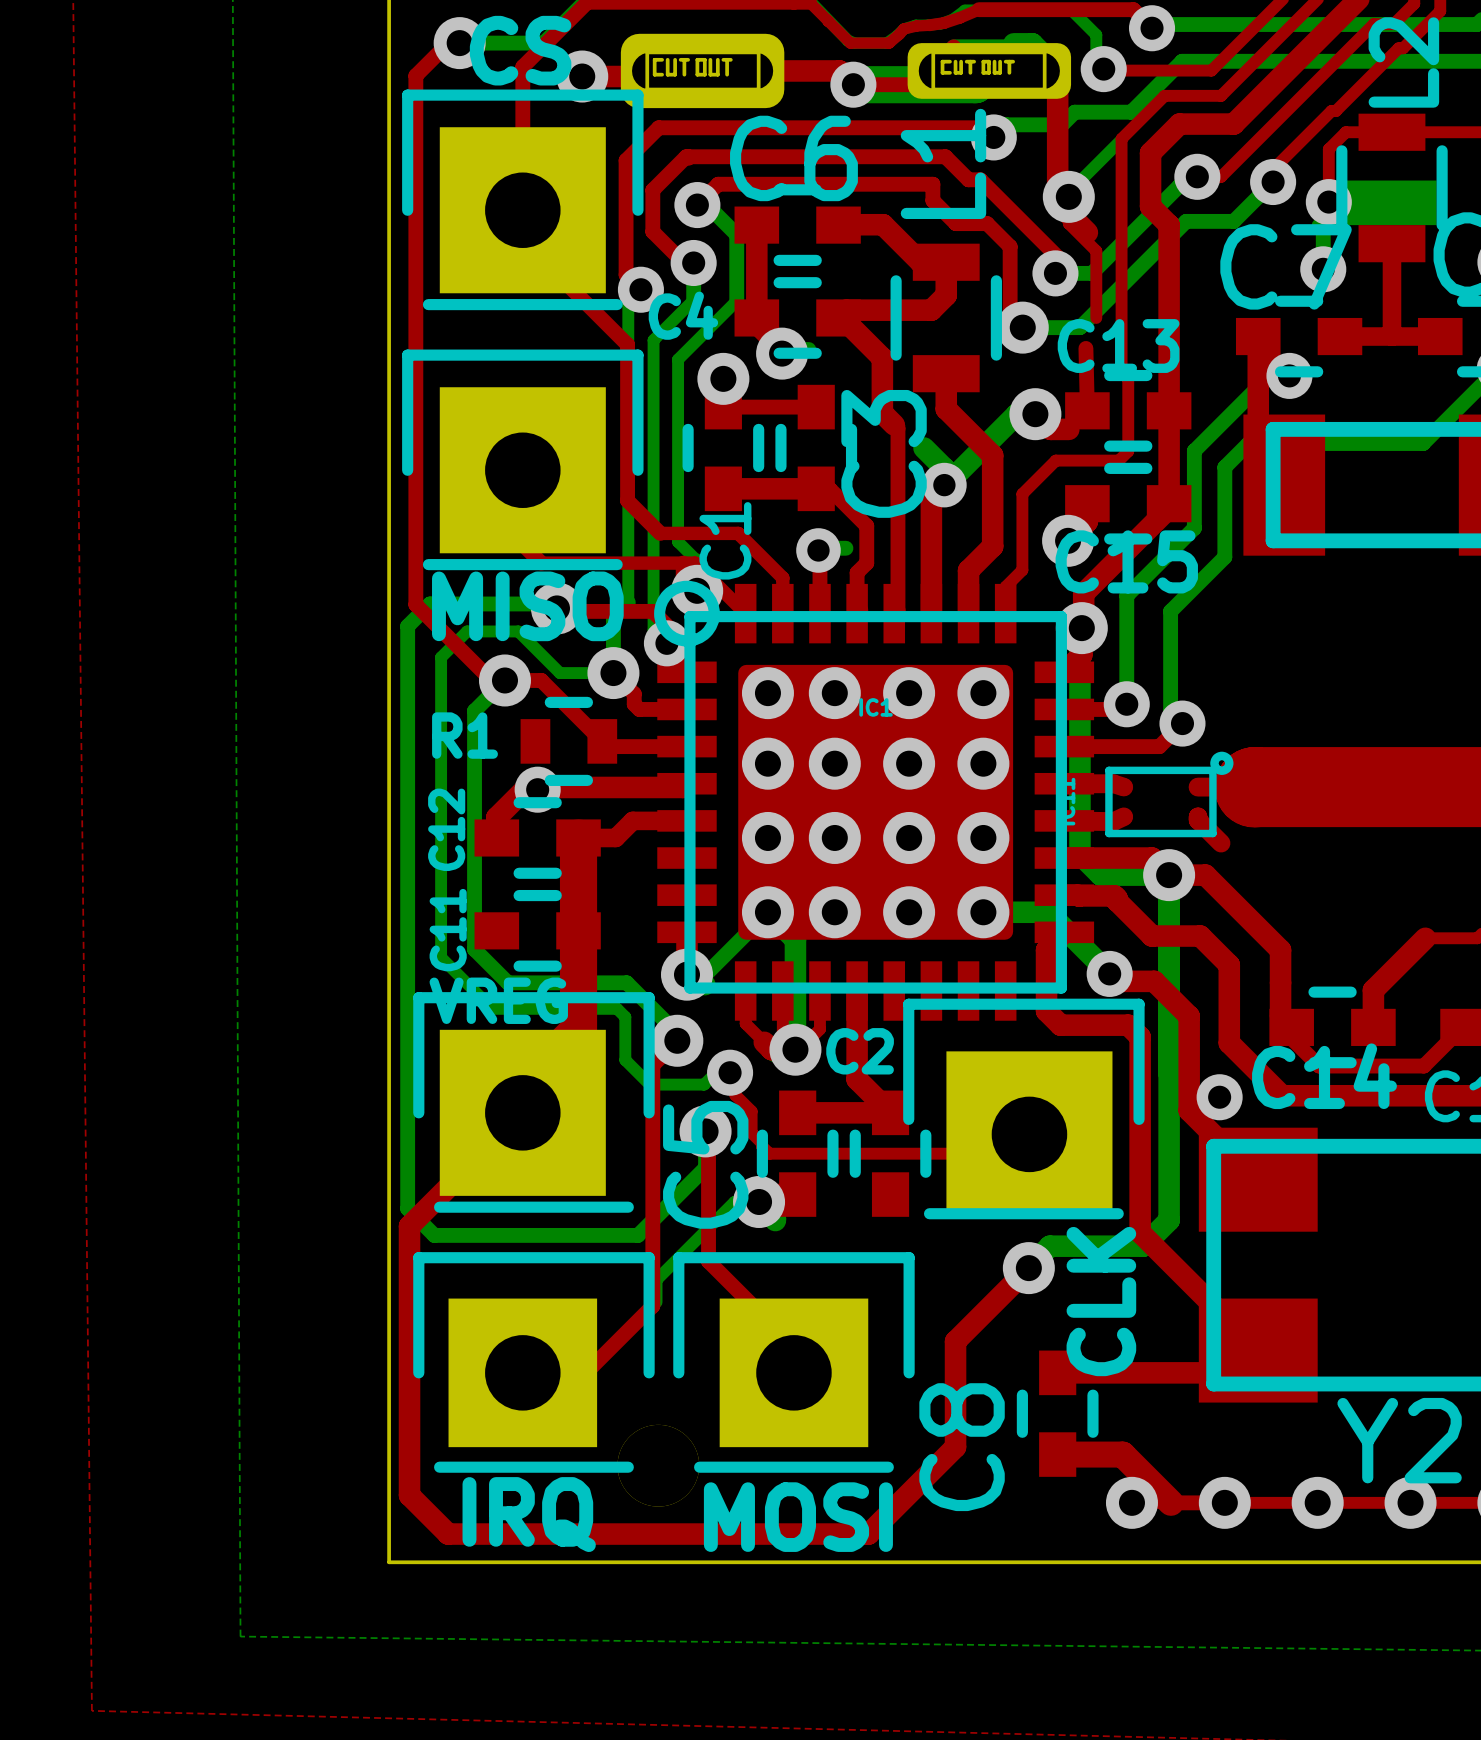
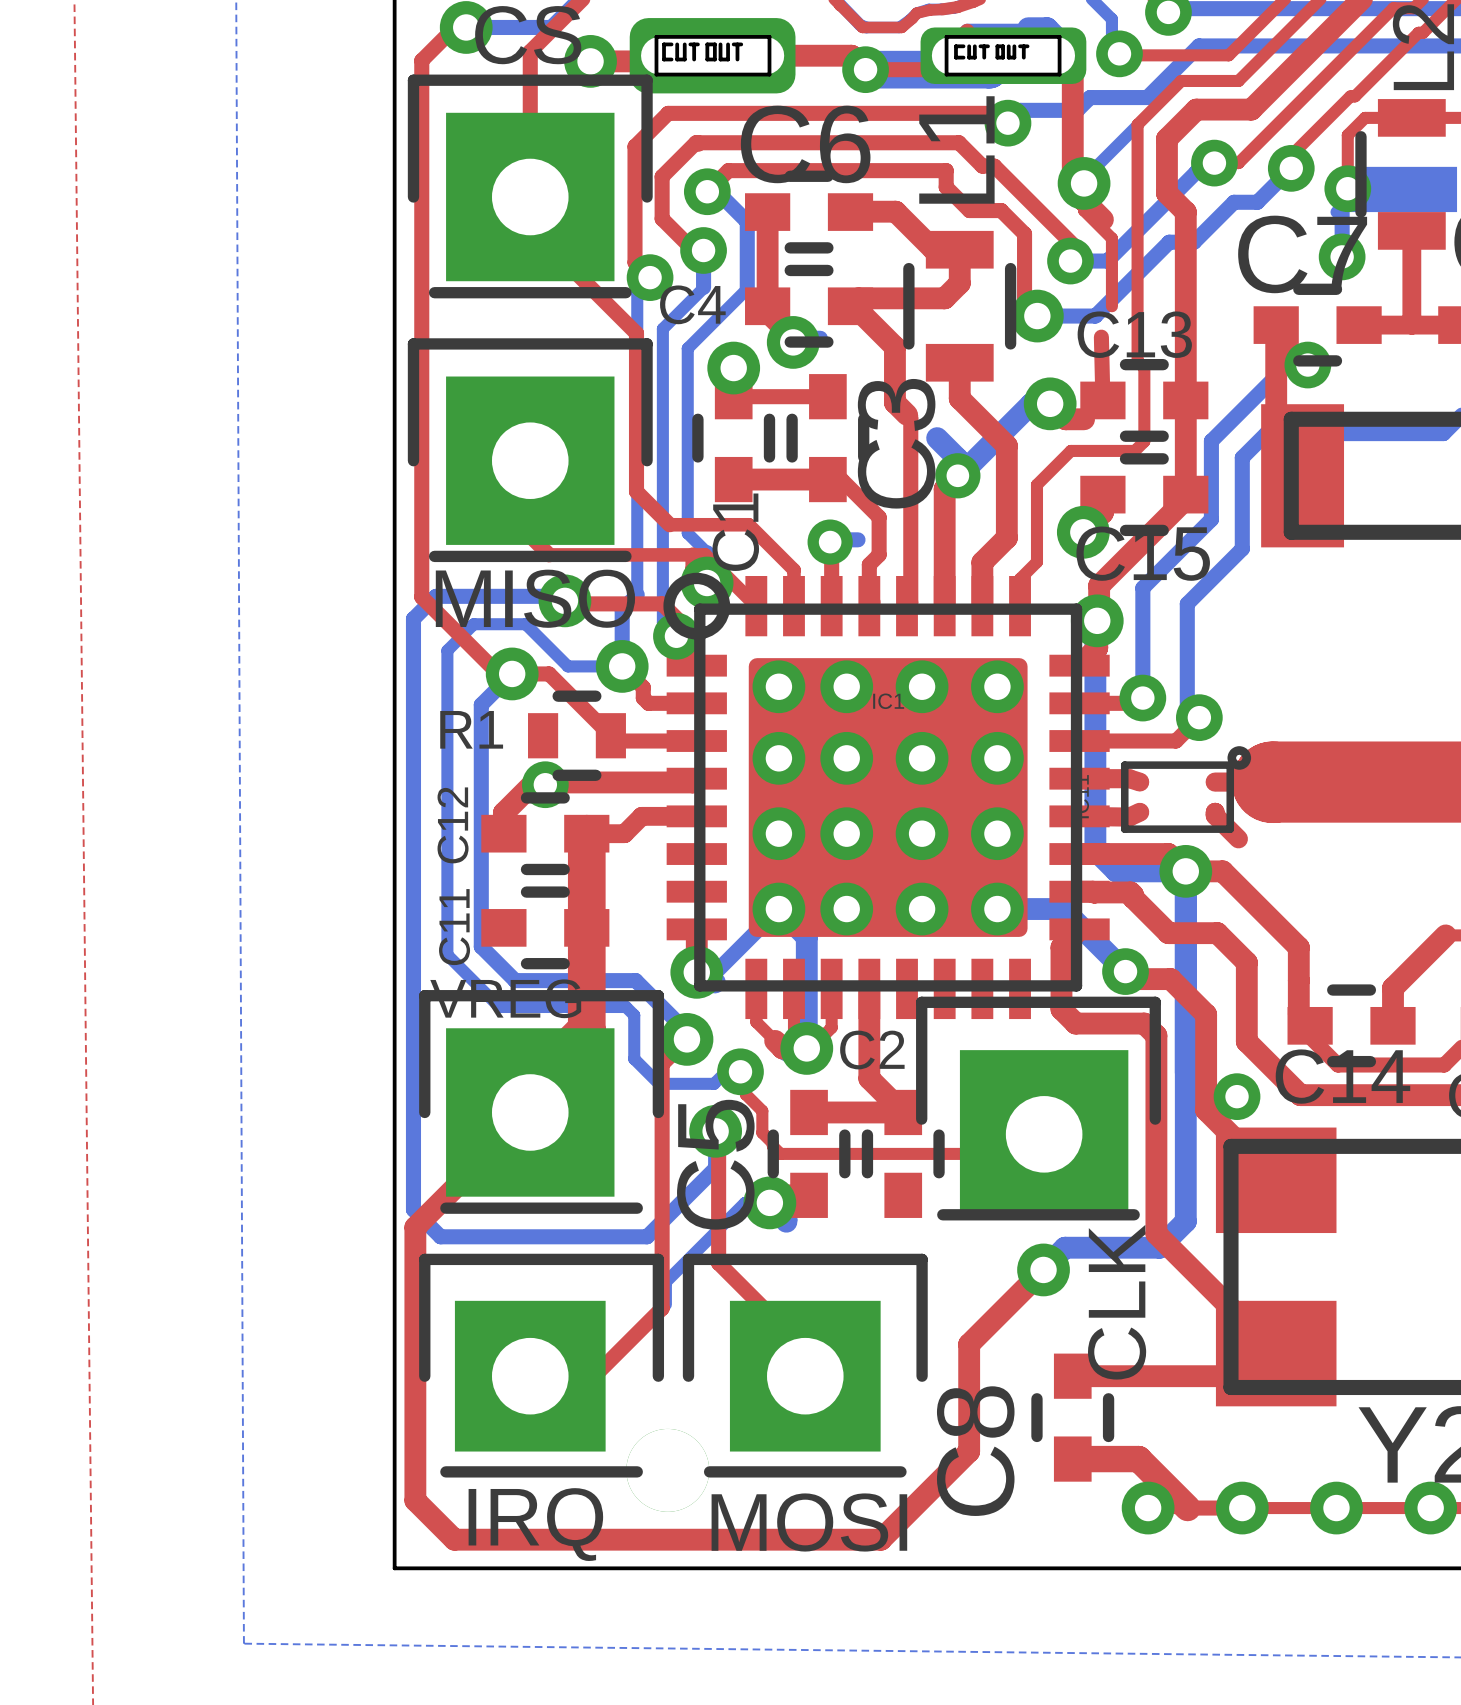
bottom track: (1239, 215) (1233, 221) (1186, 221) (1152, 254) -> (1257, 202) (1234, 202) (1194, 242) (1169, 242)

